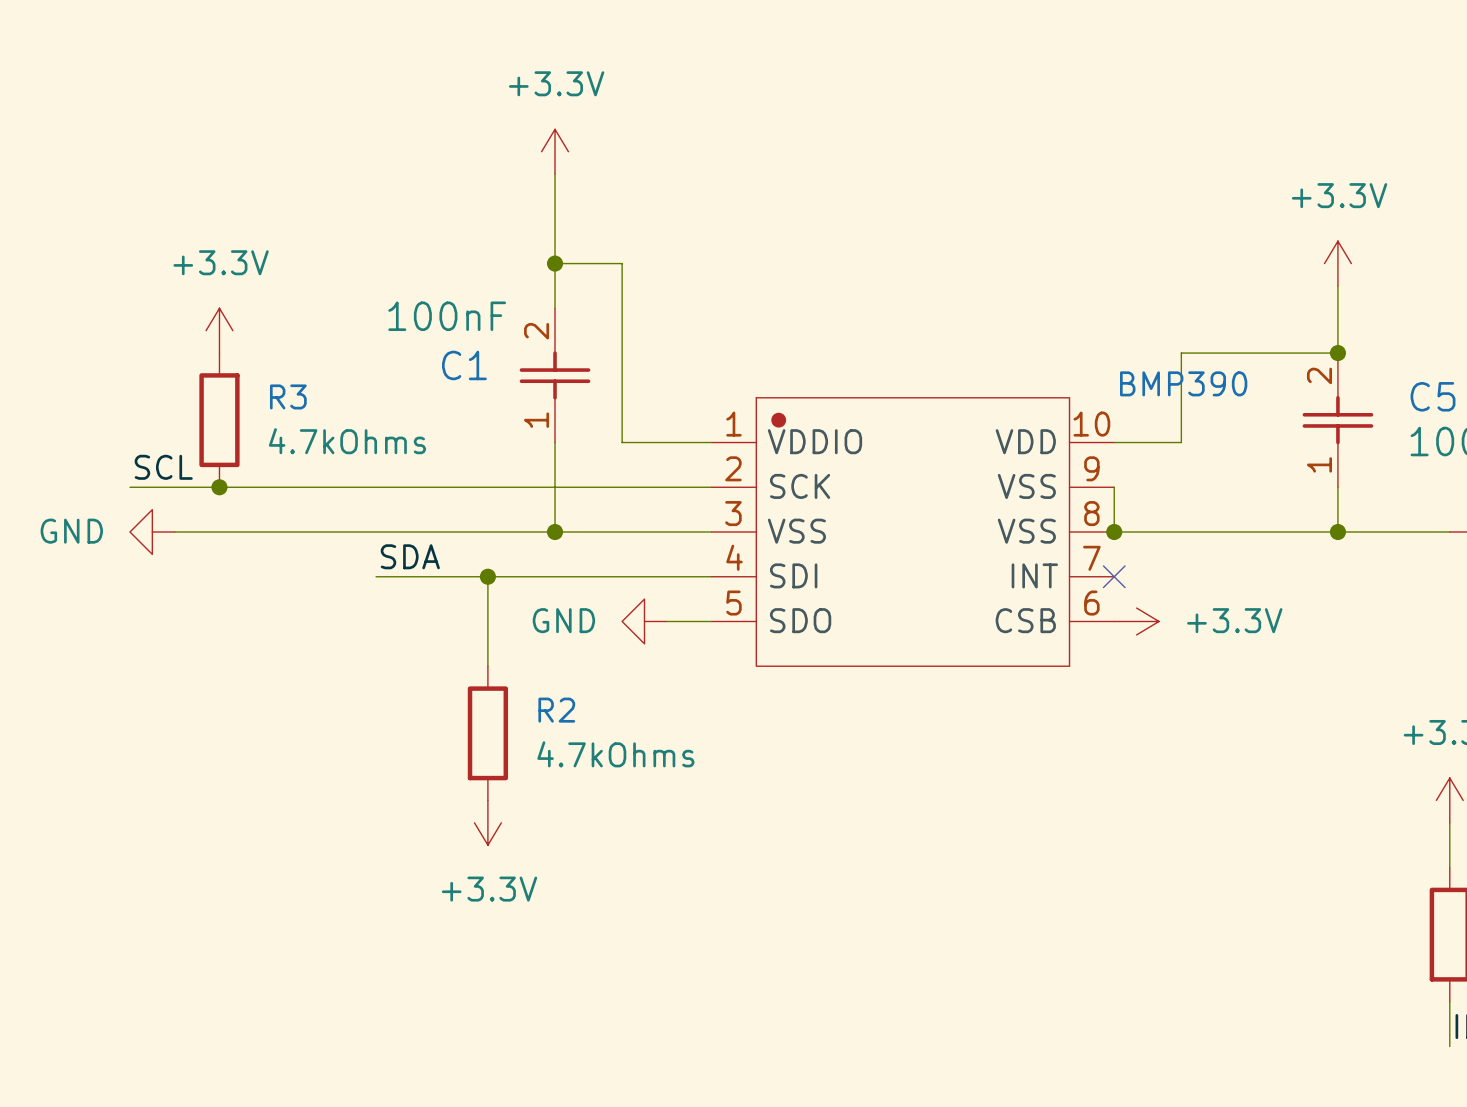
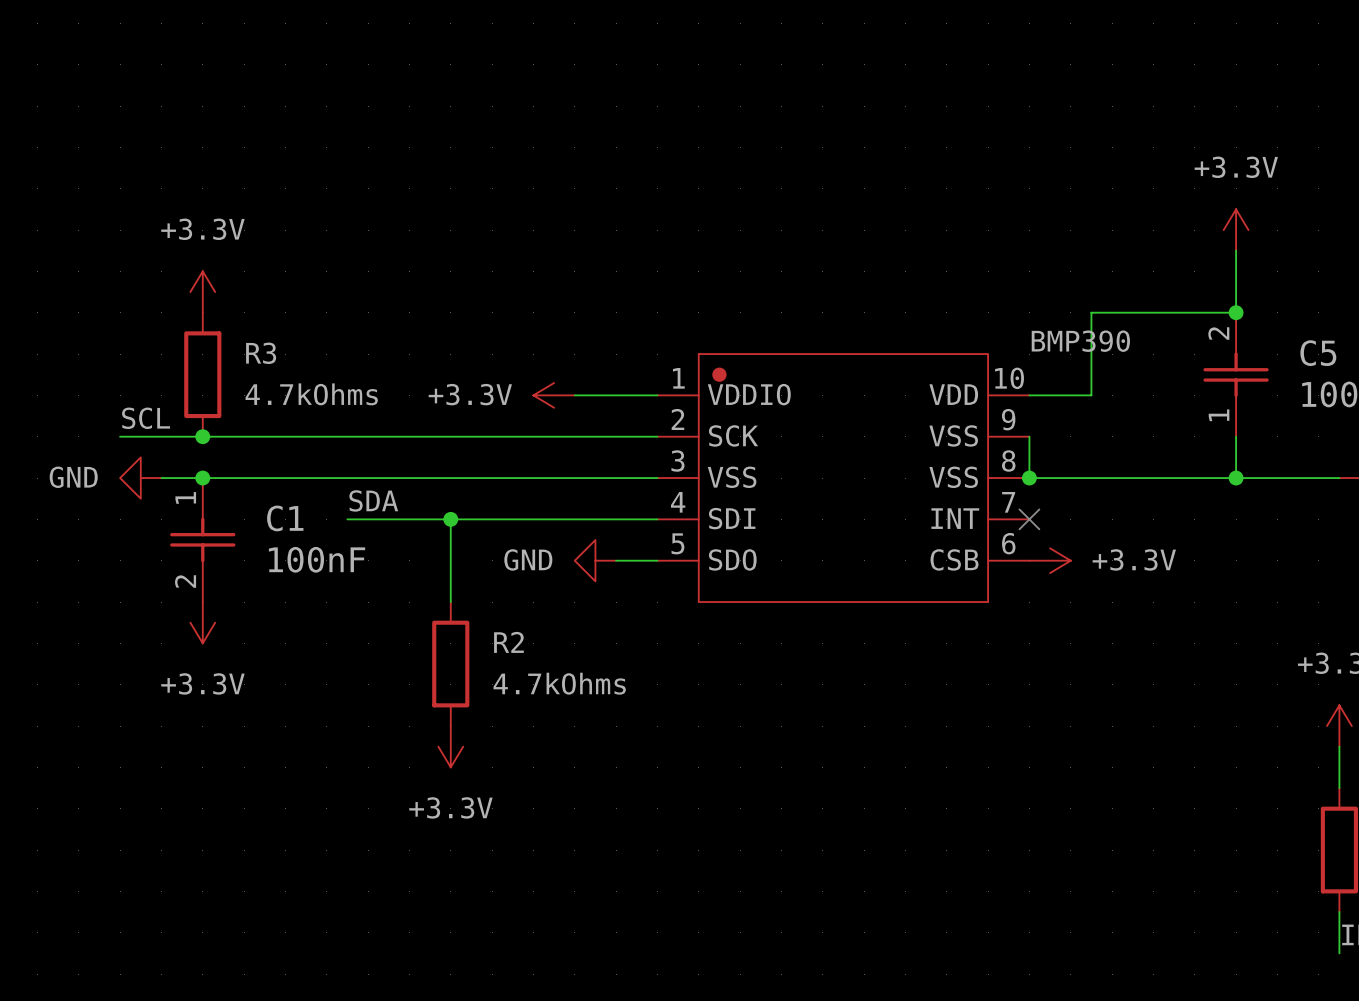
power symbol text position: +3.3V (556, 83) -> +3.3V (470, 394)
power symbol rotation: 0° (555, 151) -> 90° counterclockwise (554, 395)
power symbol position: +3.3V (555, 151) -> +3.3V (554, 395)
wire: (555, 174) (555, 308) -> none
wire: (555, 263) (622, 263) (622, 442) -> none
junction: (555, 263) -> none
C1 value position: 100nF (447, 316) -> 100nF (317, 559)
C1 rotation: 0° (555, 375) -> 180° (202, 540)
C1 position: (555, 375) -> (202, 540)
wire: (555, 442) (555, 532) -> none
junction: none -> (202, 478)
junction: (555, 532) -> none
power symbol: none -> +3.3V (202, 622)

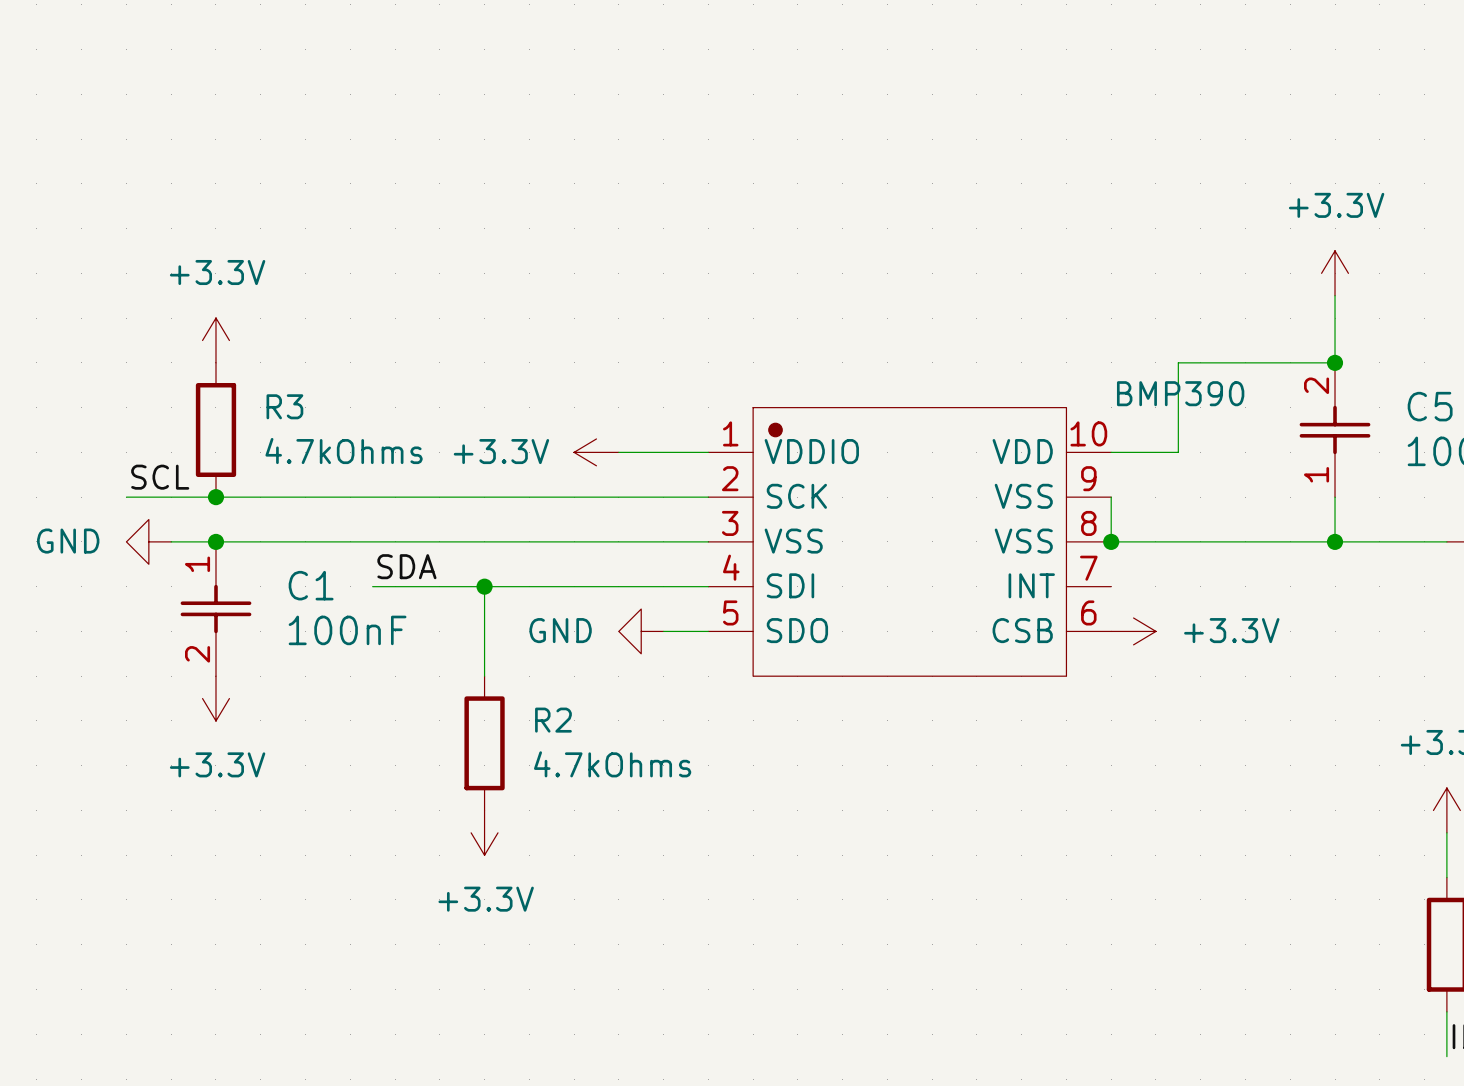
no-connect mark: (1029, 519) -> none

